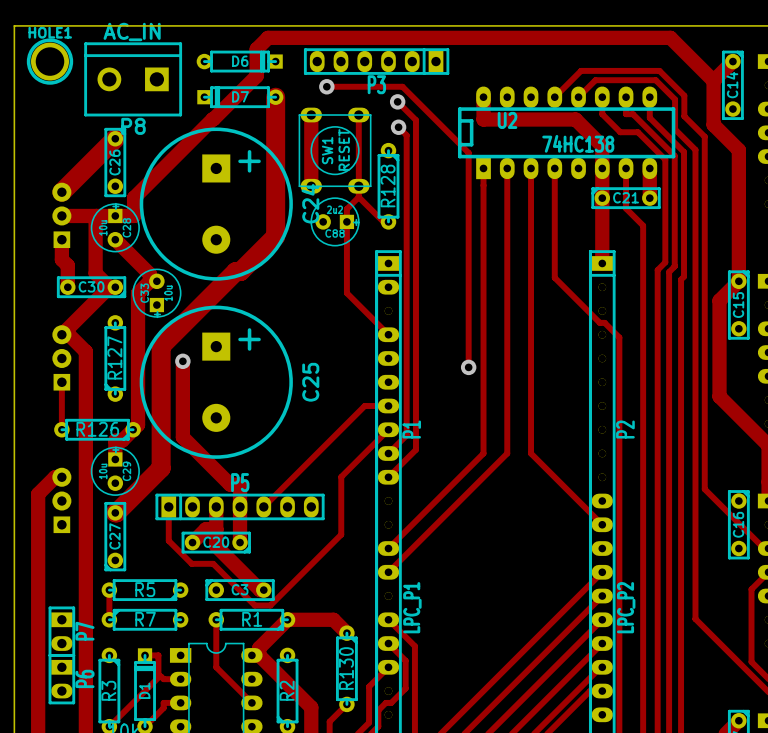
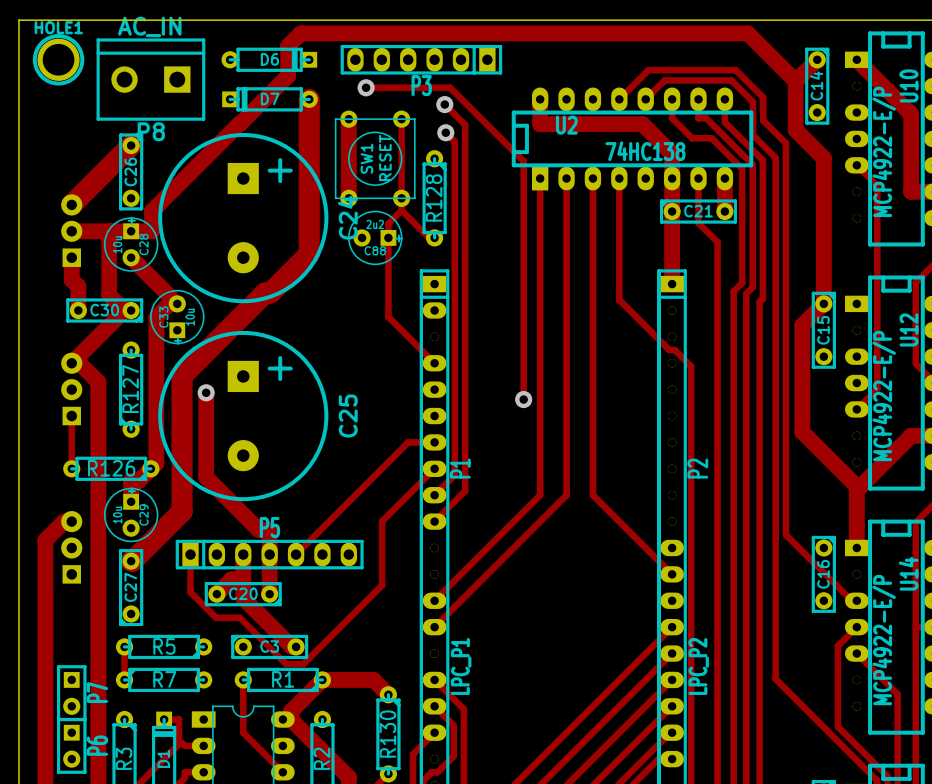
SW1 footprint: [298, 107, 372, 194] -> [334, 110, 416, 207]
P7 footprint: [48, 606, 76, 657] -> [56, 665, 87, 722]
P6 footprint: [48, 653, 76, 705] -> [56, 717, 87, 774]

